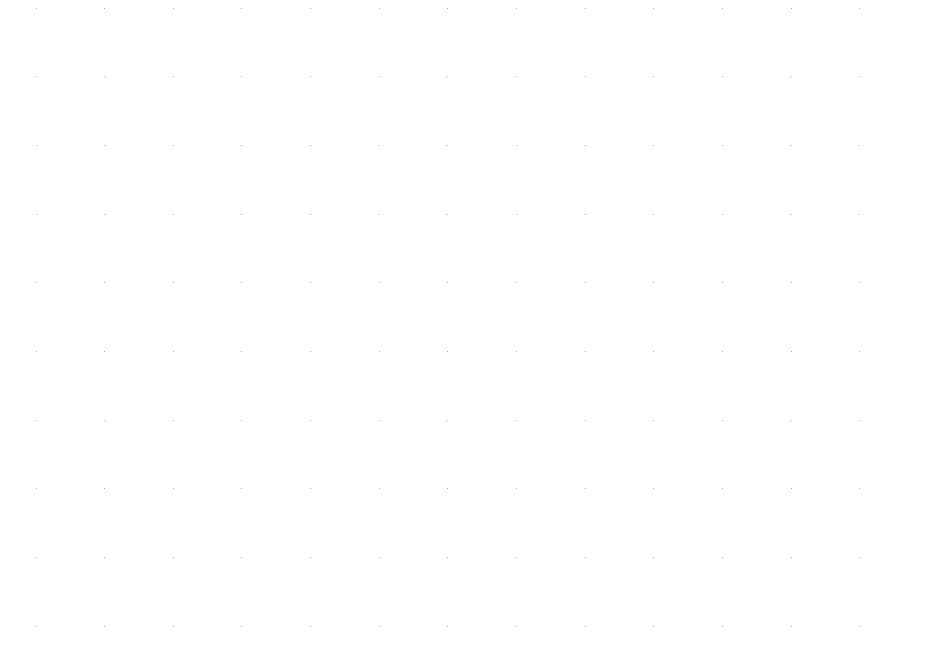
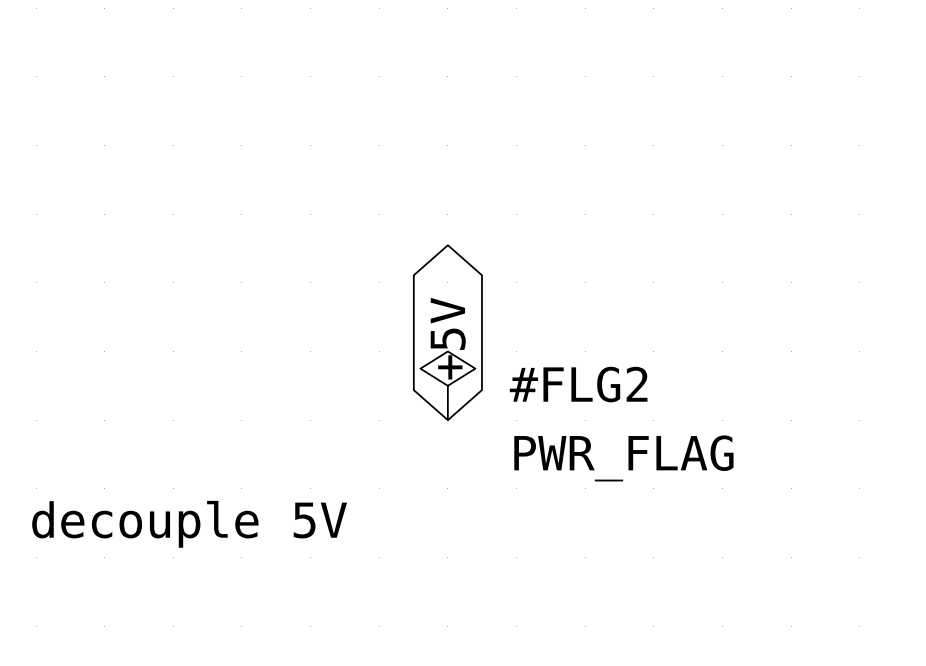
global label: none -> +5V (448, 338)
#FLG2: none -> PWR_FLAG (447, 385)
text: none -> decouple 5V (189, 524)

